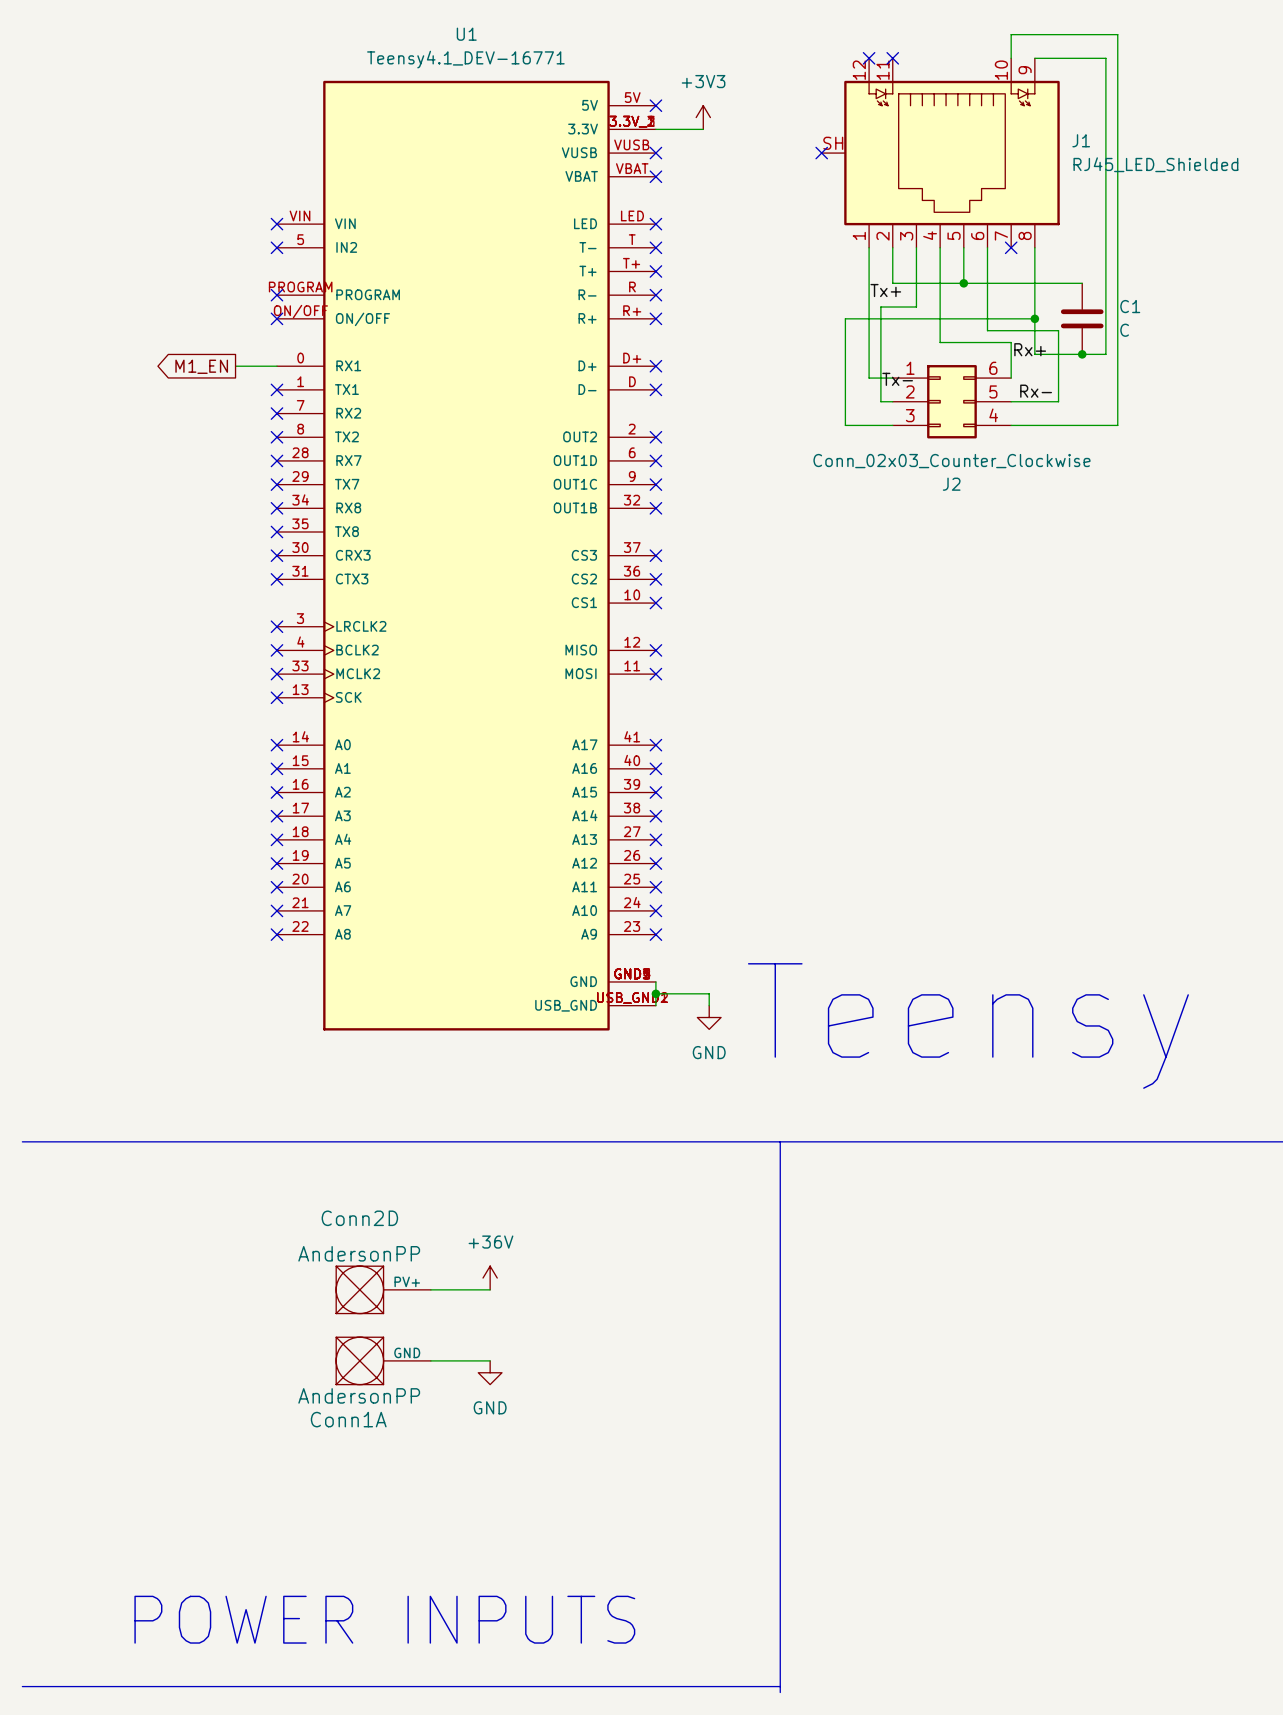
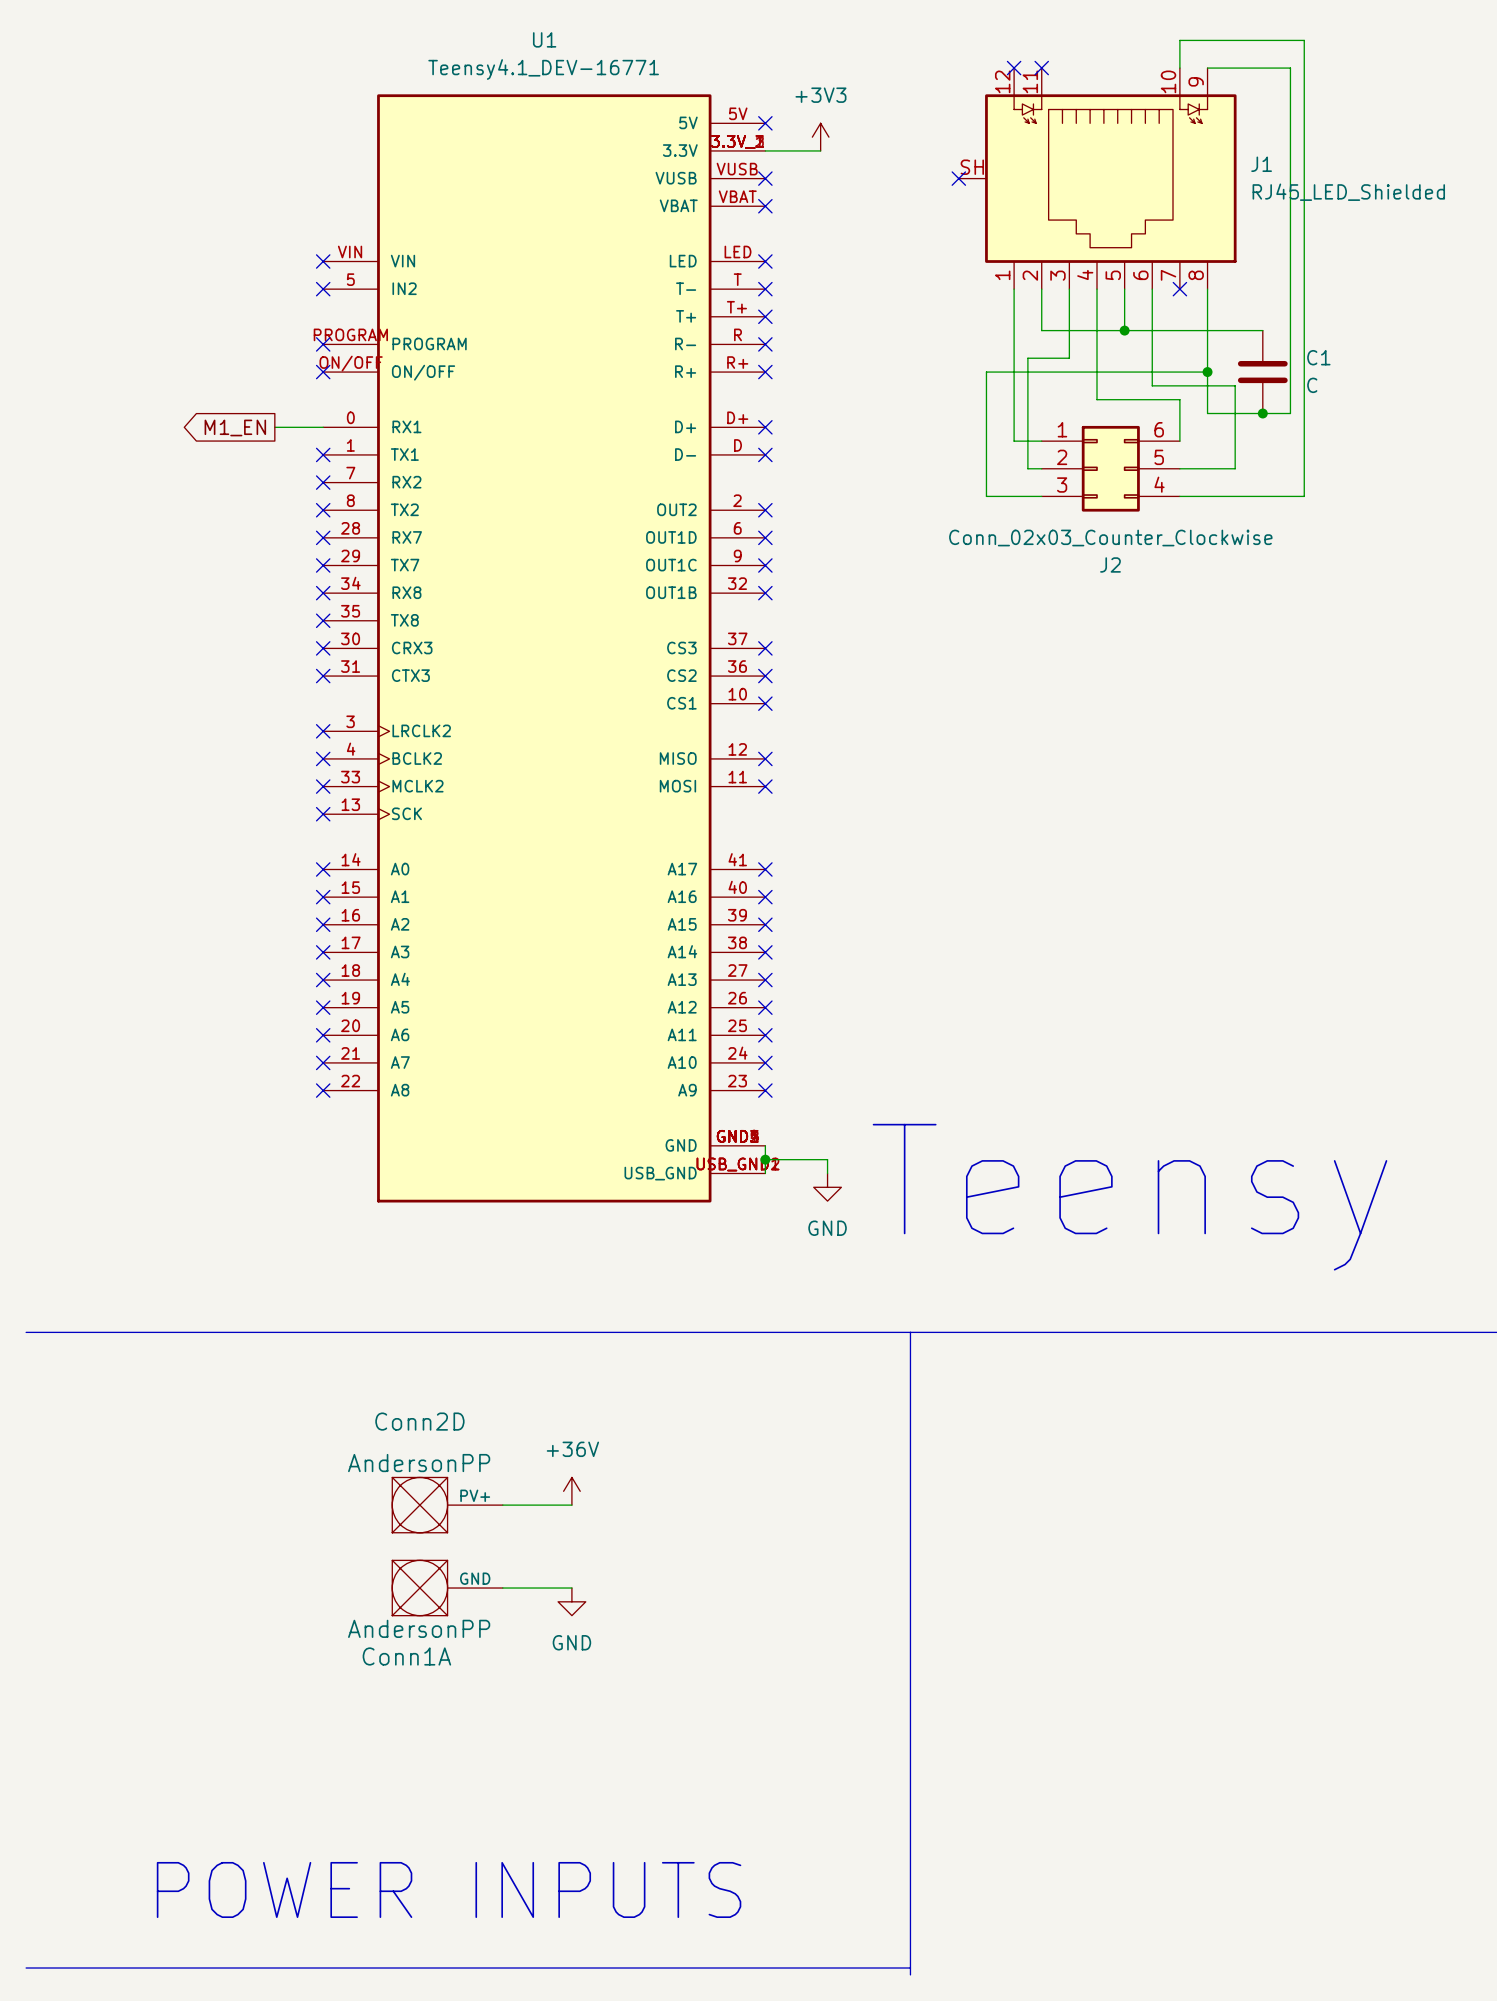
label: Tx+ (885, 290) -> none
label: Rx+ (1030, 349) -> none
label: Tx- (897, 379) -> none
label: Rx- (1036, 391) -> none

